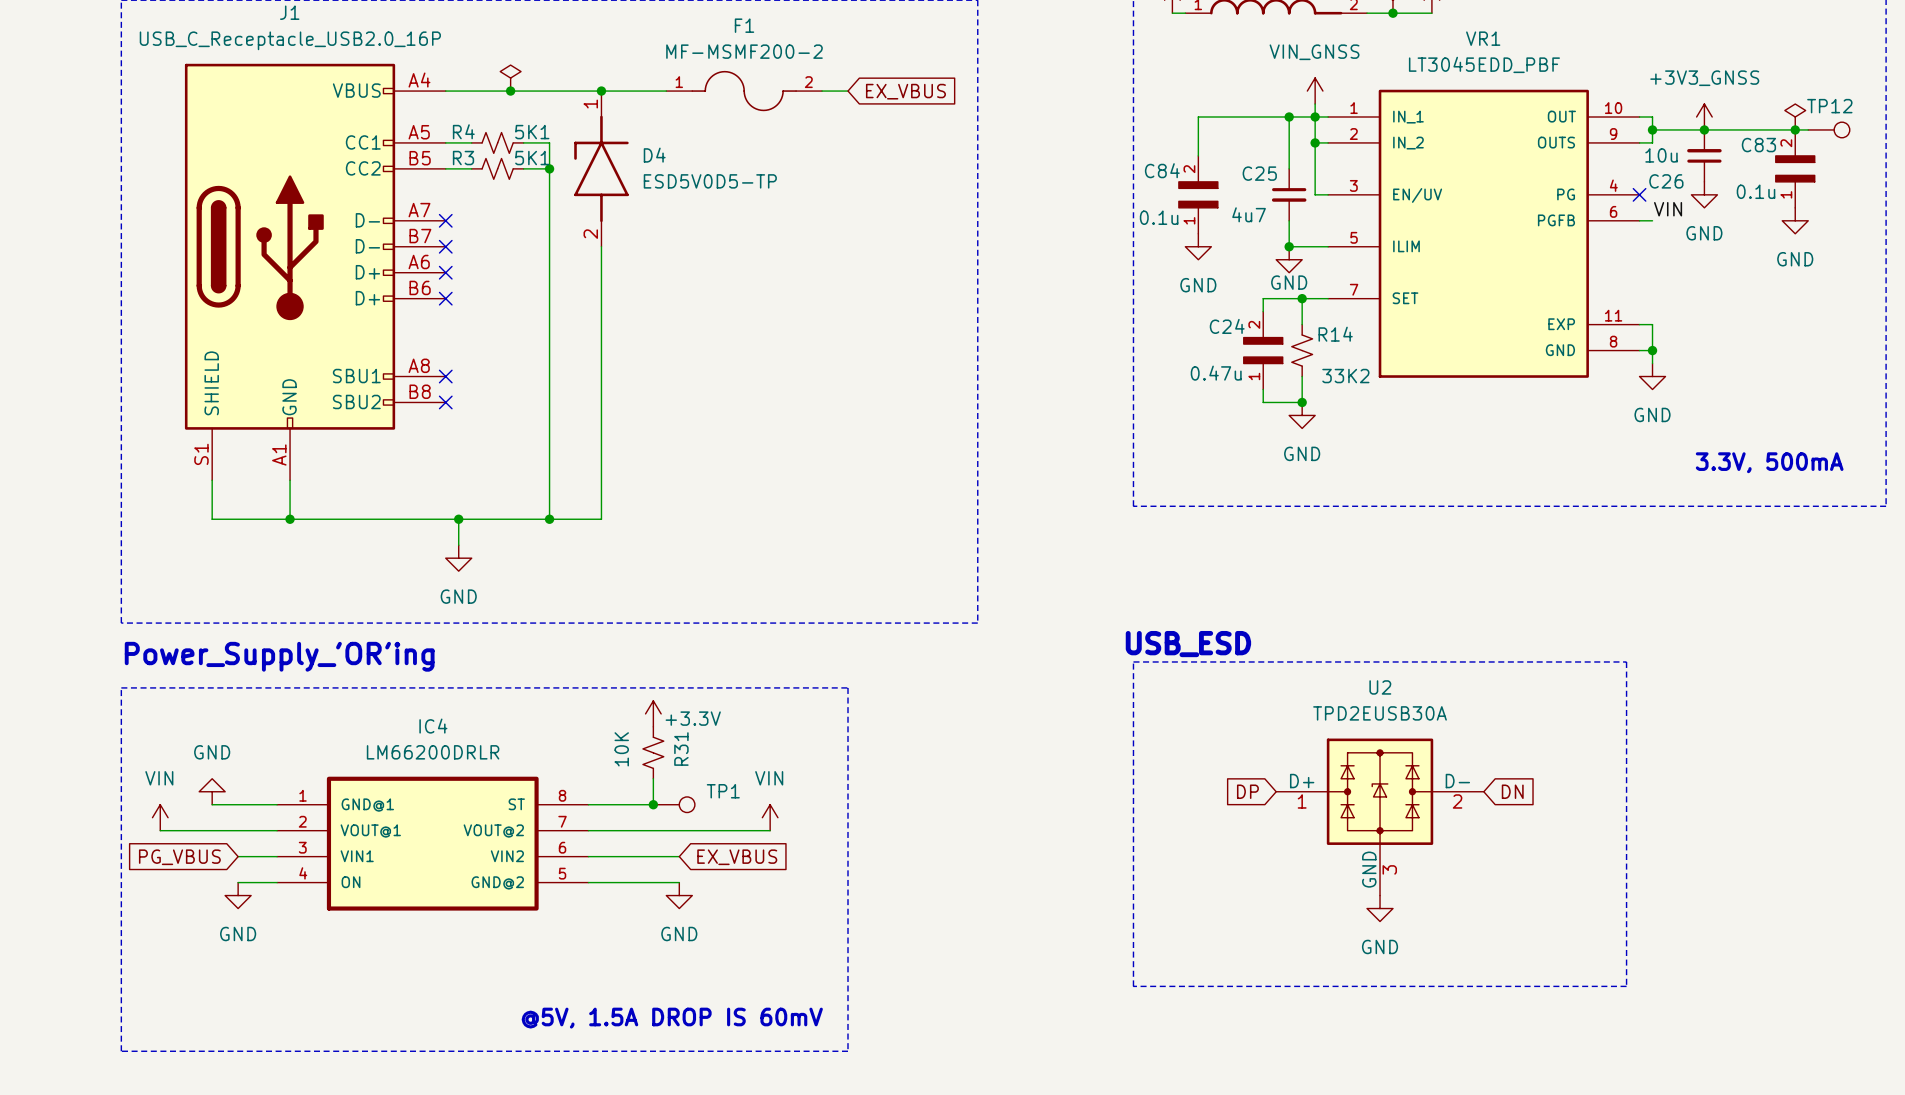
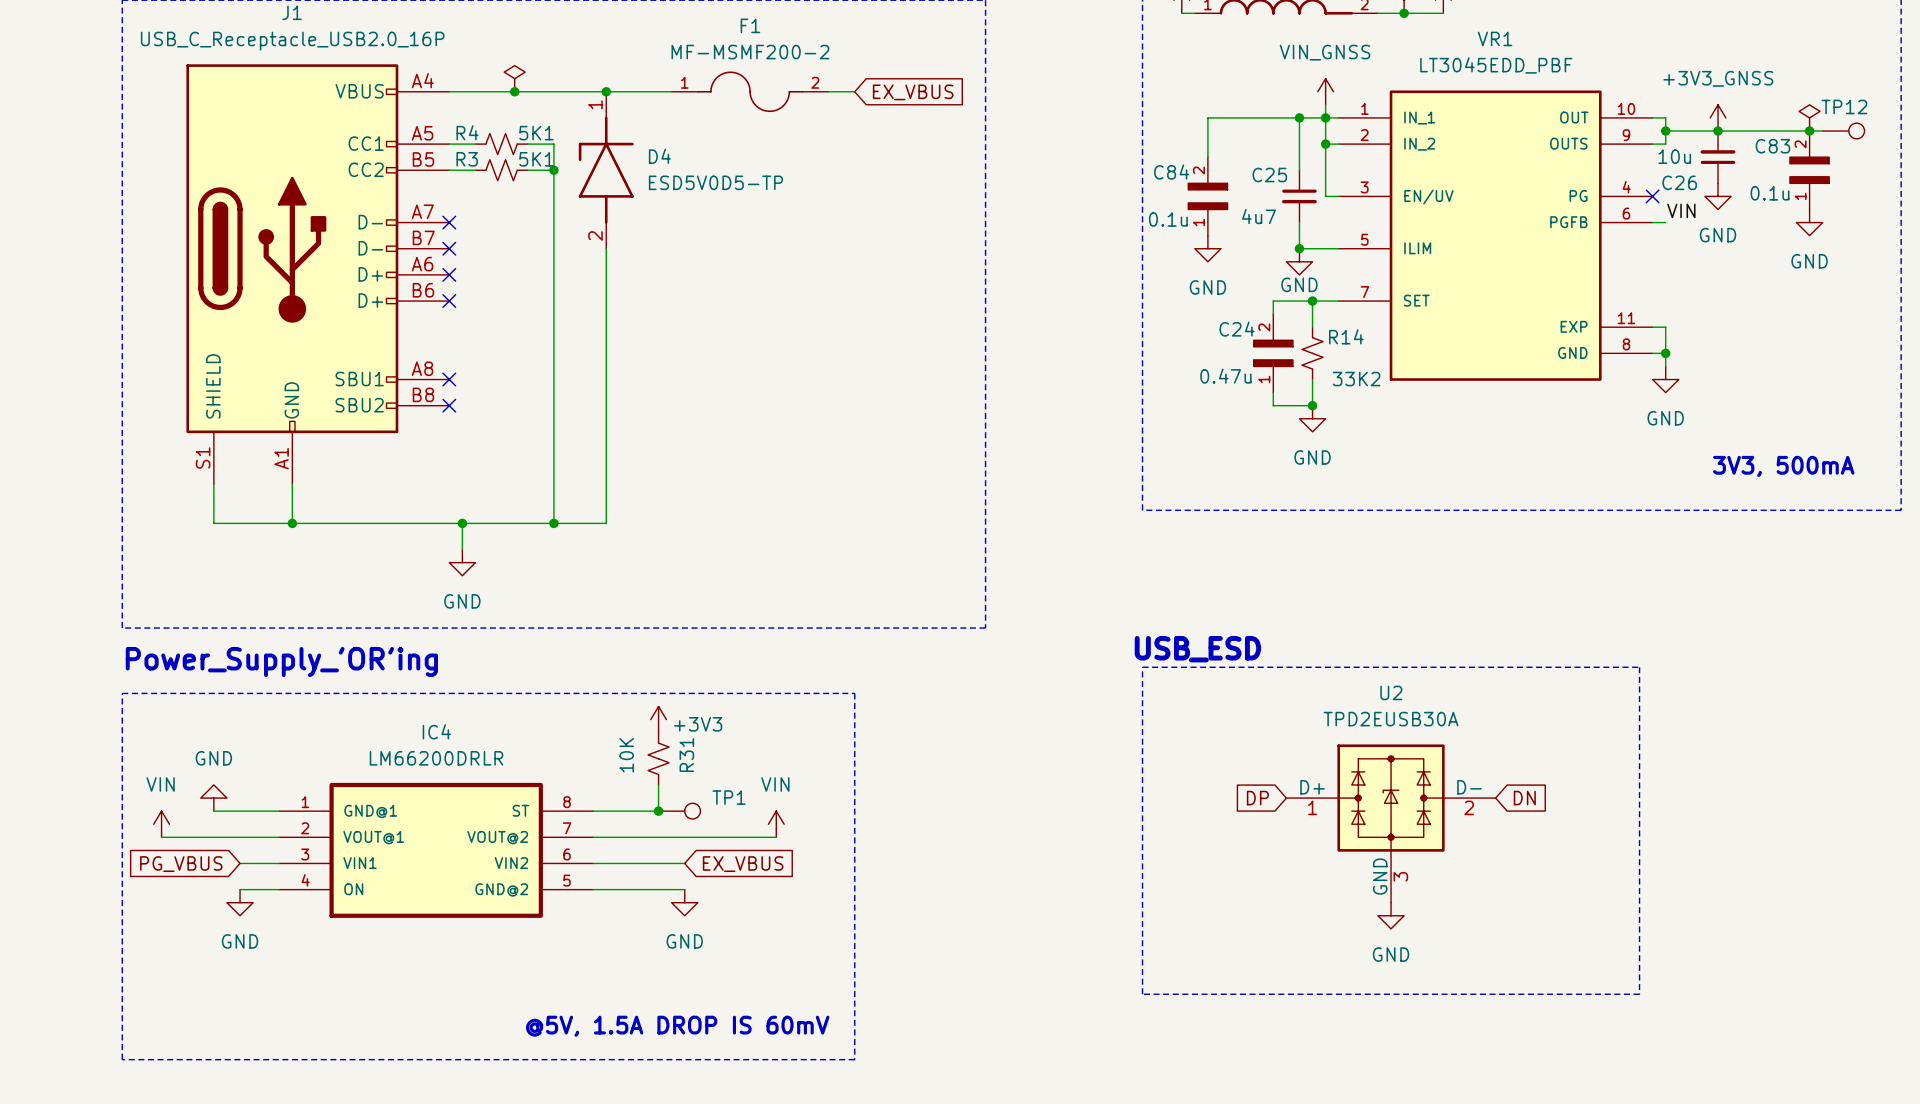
text: 3.3V, 500mA (1769, 462) -> 3V3, 500mA (1783, 466)
power symbol: +3.3V (653, 713) -> +3V3 (658, 719)

